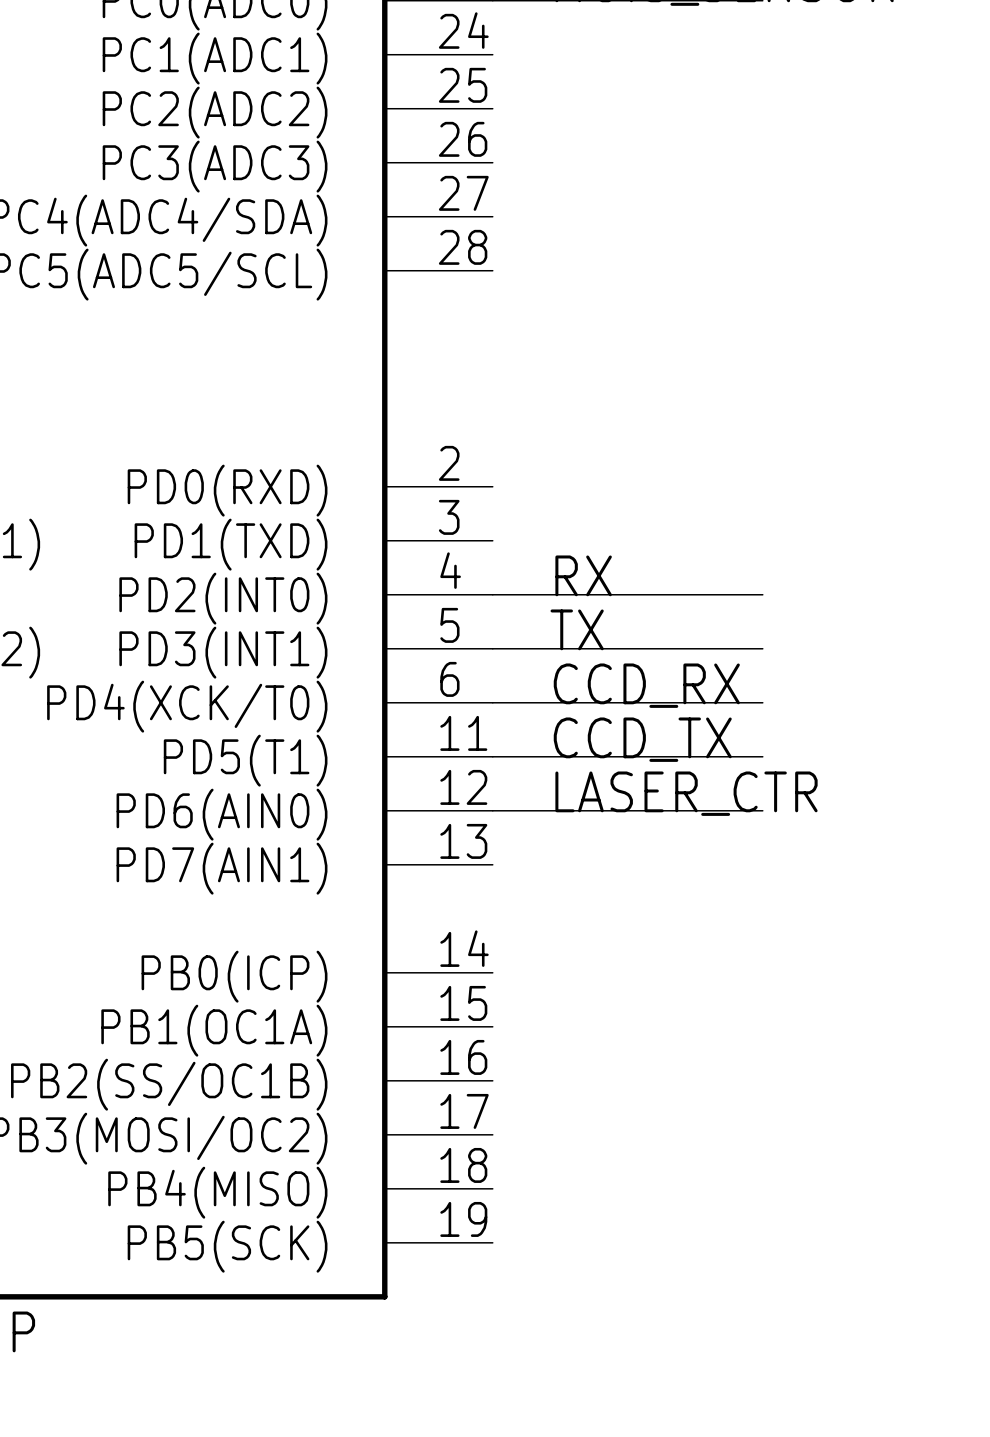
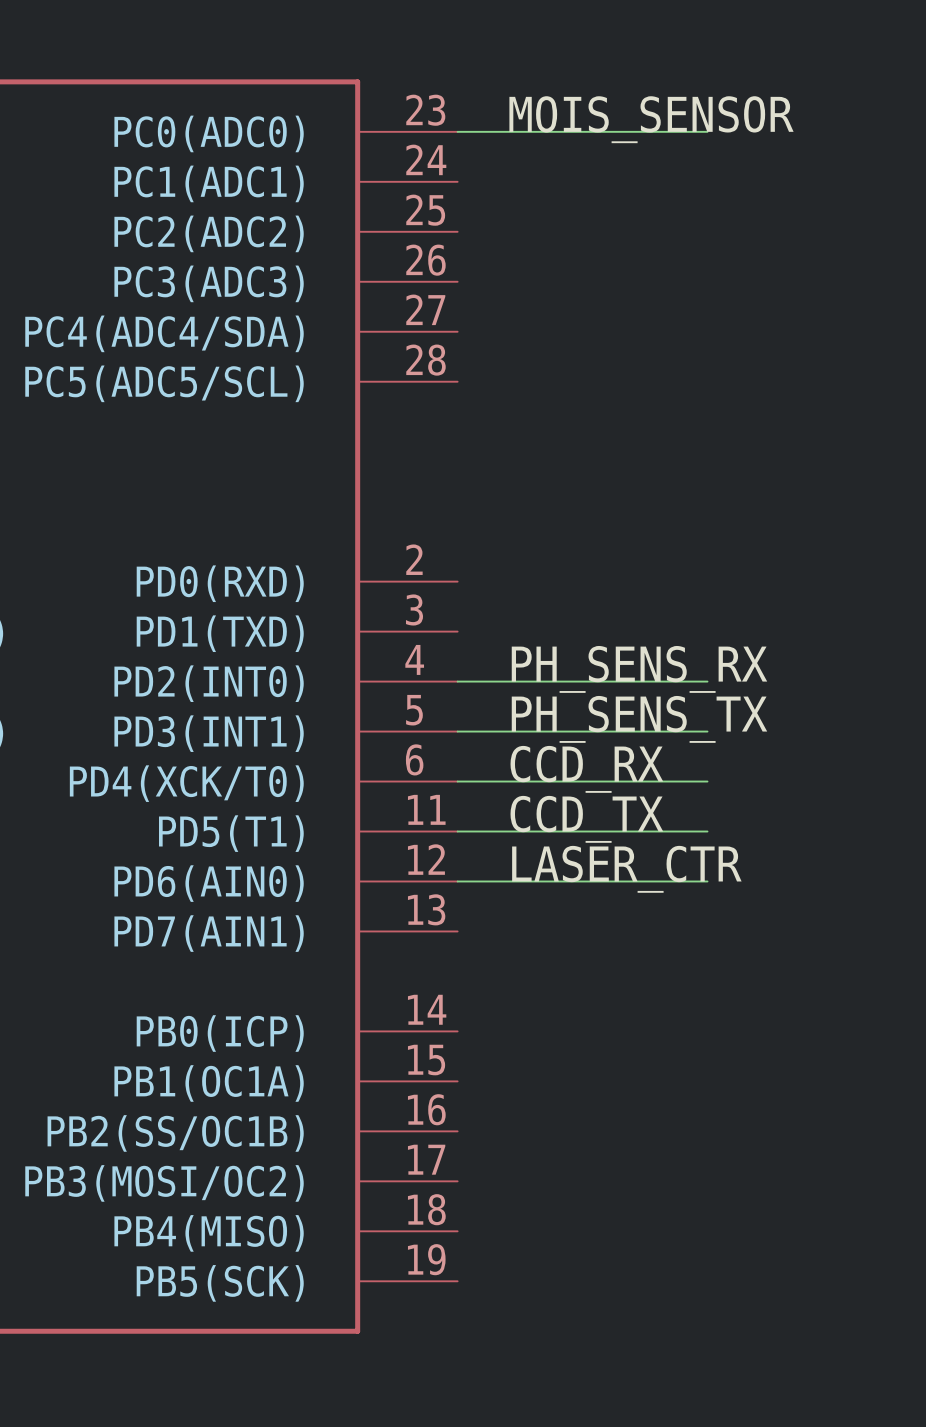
label: RX (583, 575) -> PH_SENS_RX (639, 669)
label: TX (577, 629) -> PH_SENS_TX (639, 719)

